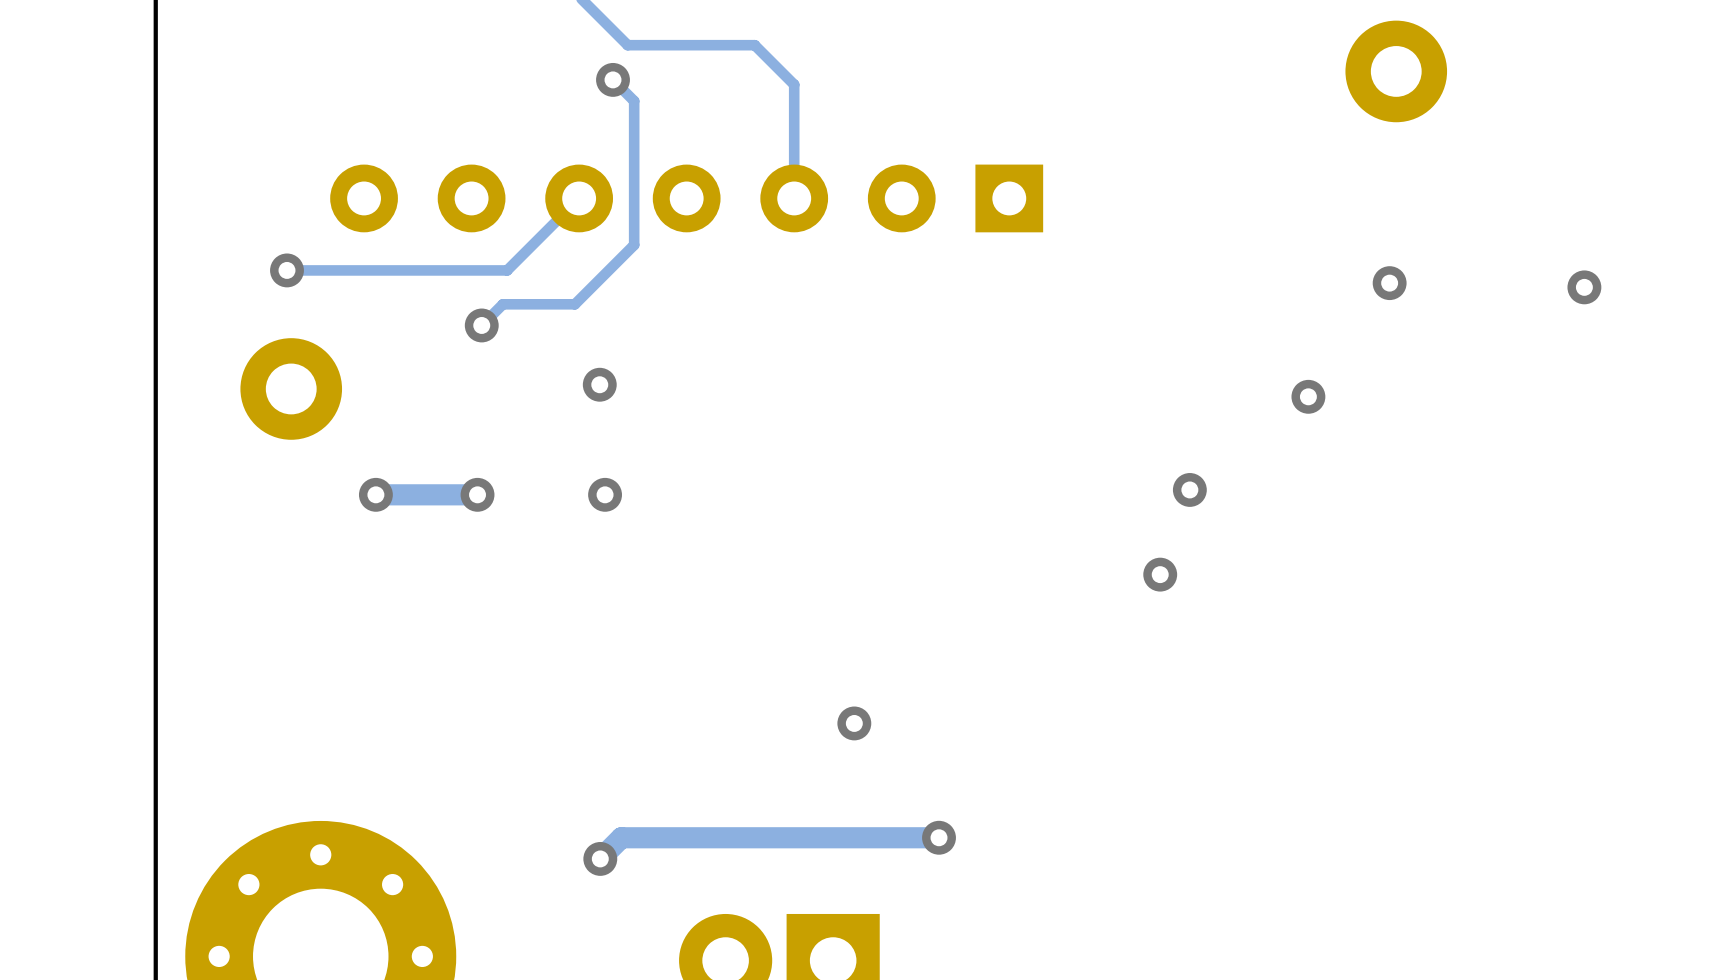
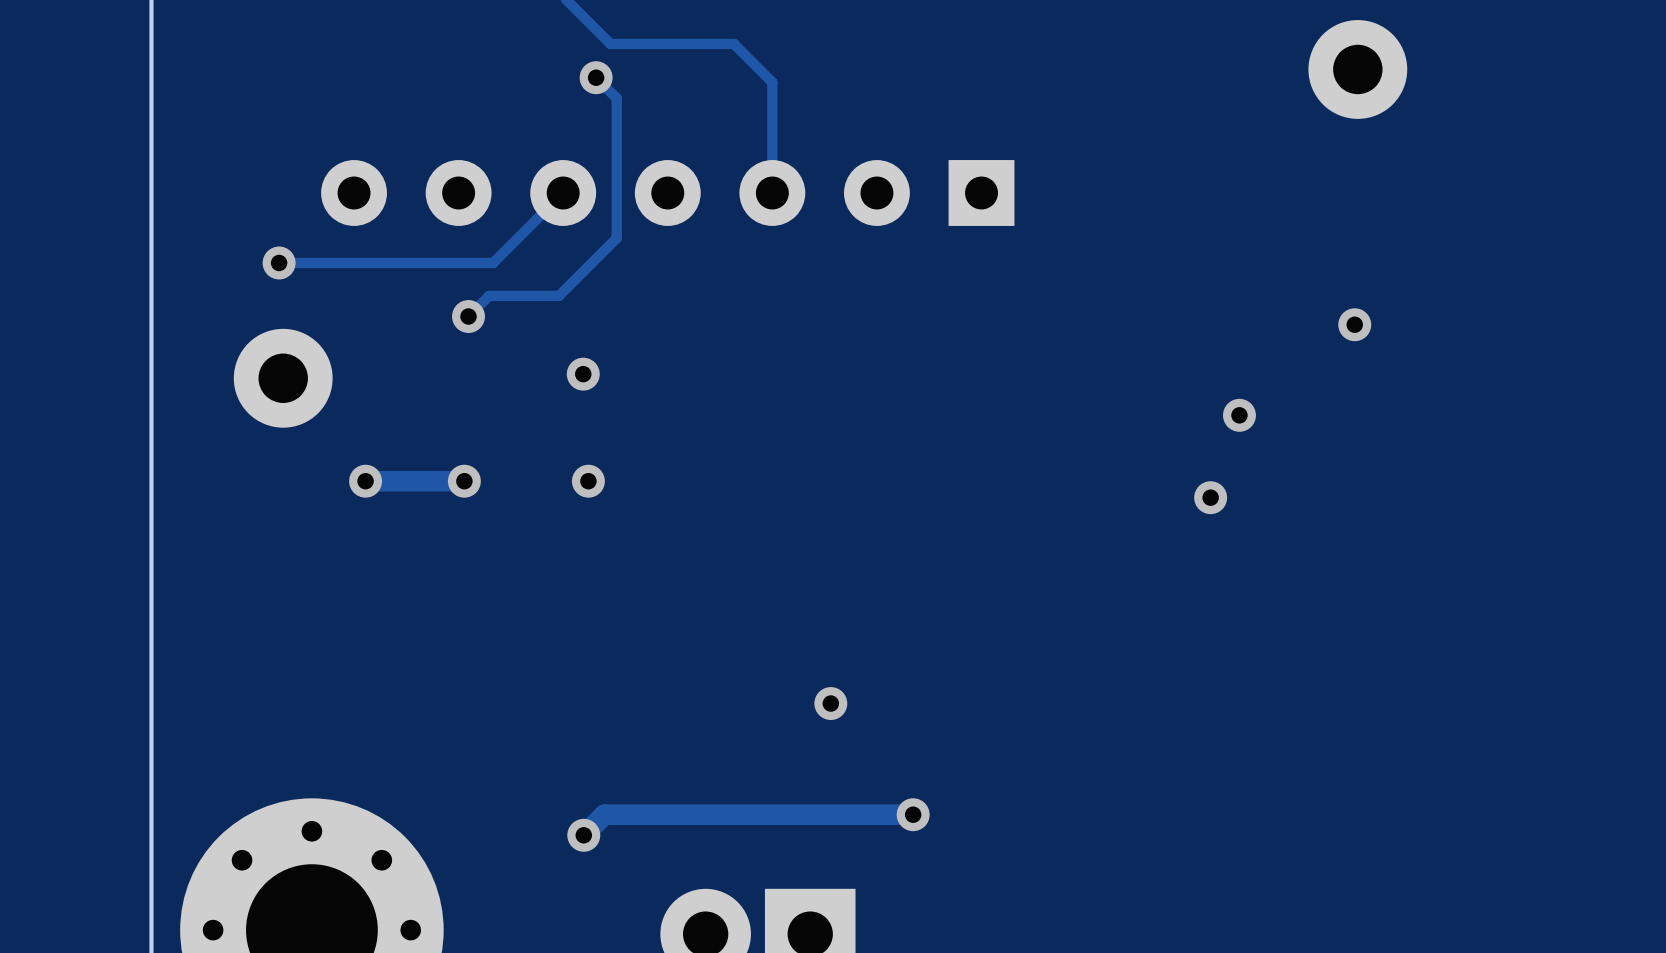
via position: (1389, 283) -> (1354, 324)
via: (1584, 287) -> none
via position: (1308, 396) -> (1239, 415)
via: (1189, 489) -> none
via: none -> (1210, 497)
via: (1160, 574) -> none

